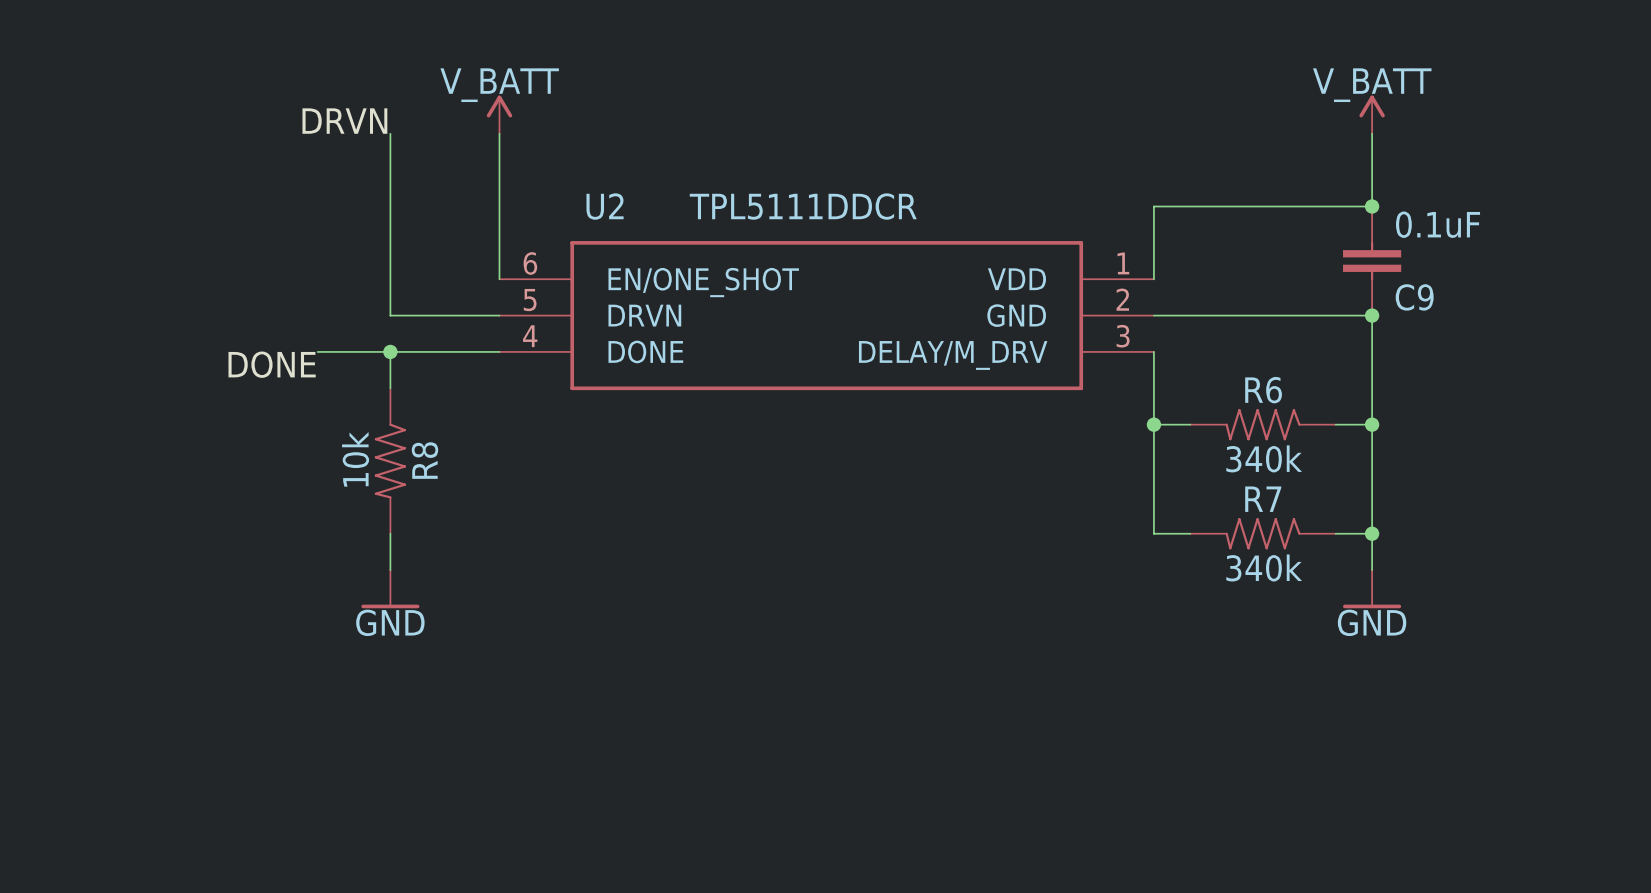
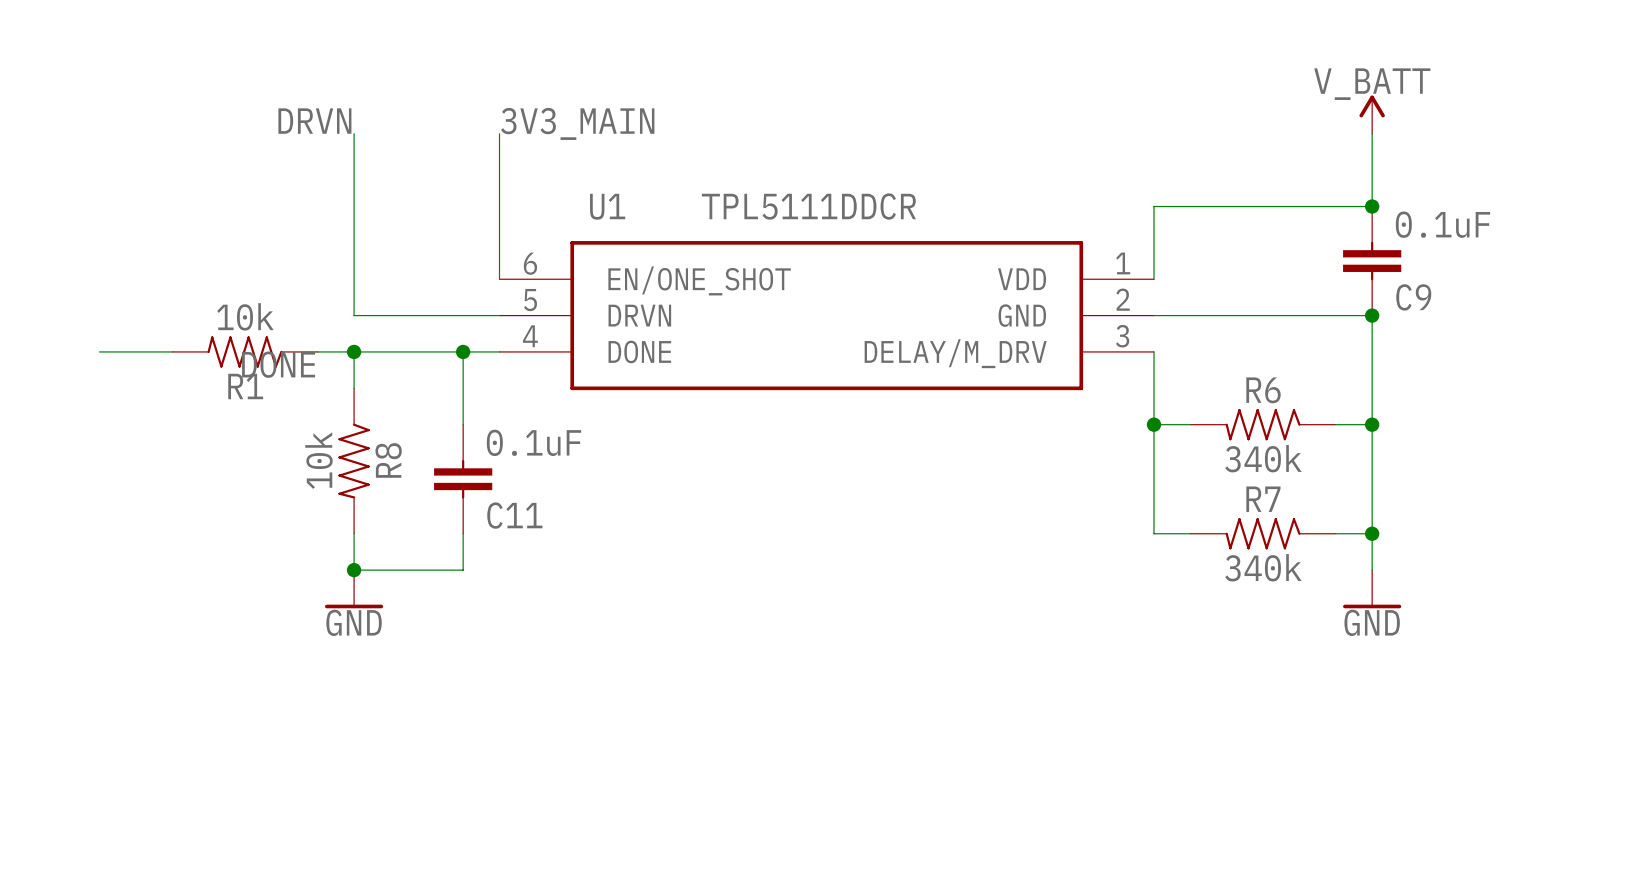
power symbol: V_BATT (499, 114) -> none
label position: DRVN (344, 121) -> DRVN (314, 121)
label: none -> 3V3_MAIN (577, 123)
wire: (390, 133) (390, 315) -> (354, 133) (354, 315) (390, 315)
U2 name: U2 (605, 206) -> U1 (607, 206)
wire: none -> (99, 351) (172, 351)
R1: none -> 10k (244, 351)
junction: none -> (354, 351)
wire: (390, 351) (390, 388) -> (354, 351) (354, 388)
junction: (390, 351) -> none
wire: none -> (463, 351) (463, 424)
junction: none -> (463, 351)
R8 position: (390, 461) -> (354, 461)
C11: none -> 0.1uF (463, 479)
wire: none -> (354, 533) (354, 570) (463, 570) (463, 533)
wire: (390, 533) (390, 570) -> none
junction: none -> (354, 570)
power symbol position: GND (390, 589) -> GND (354, 589)

